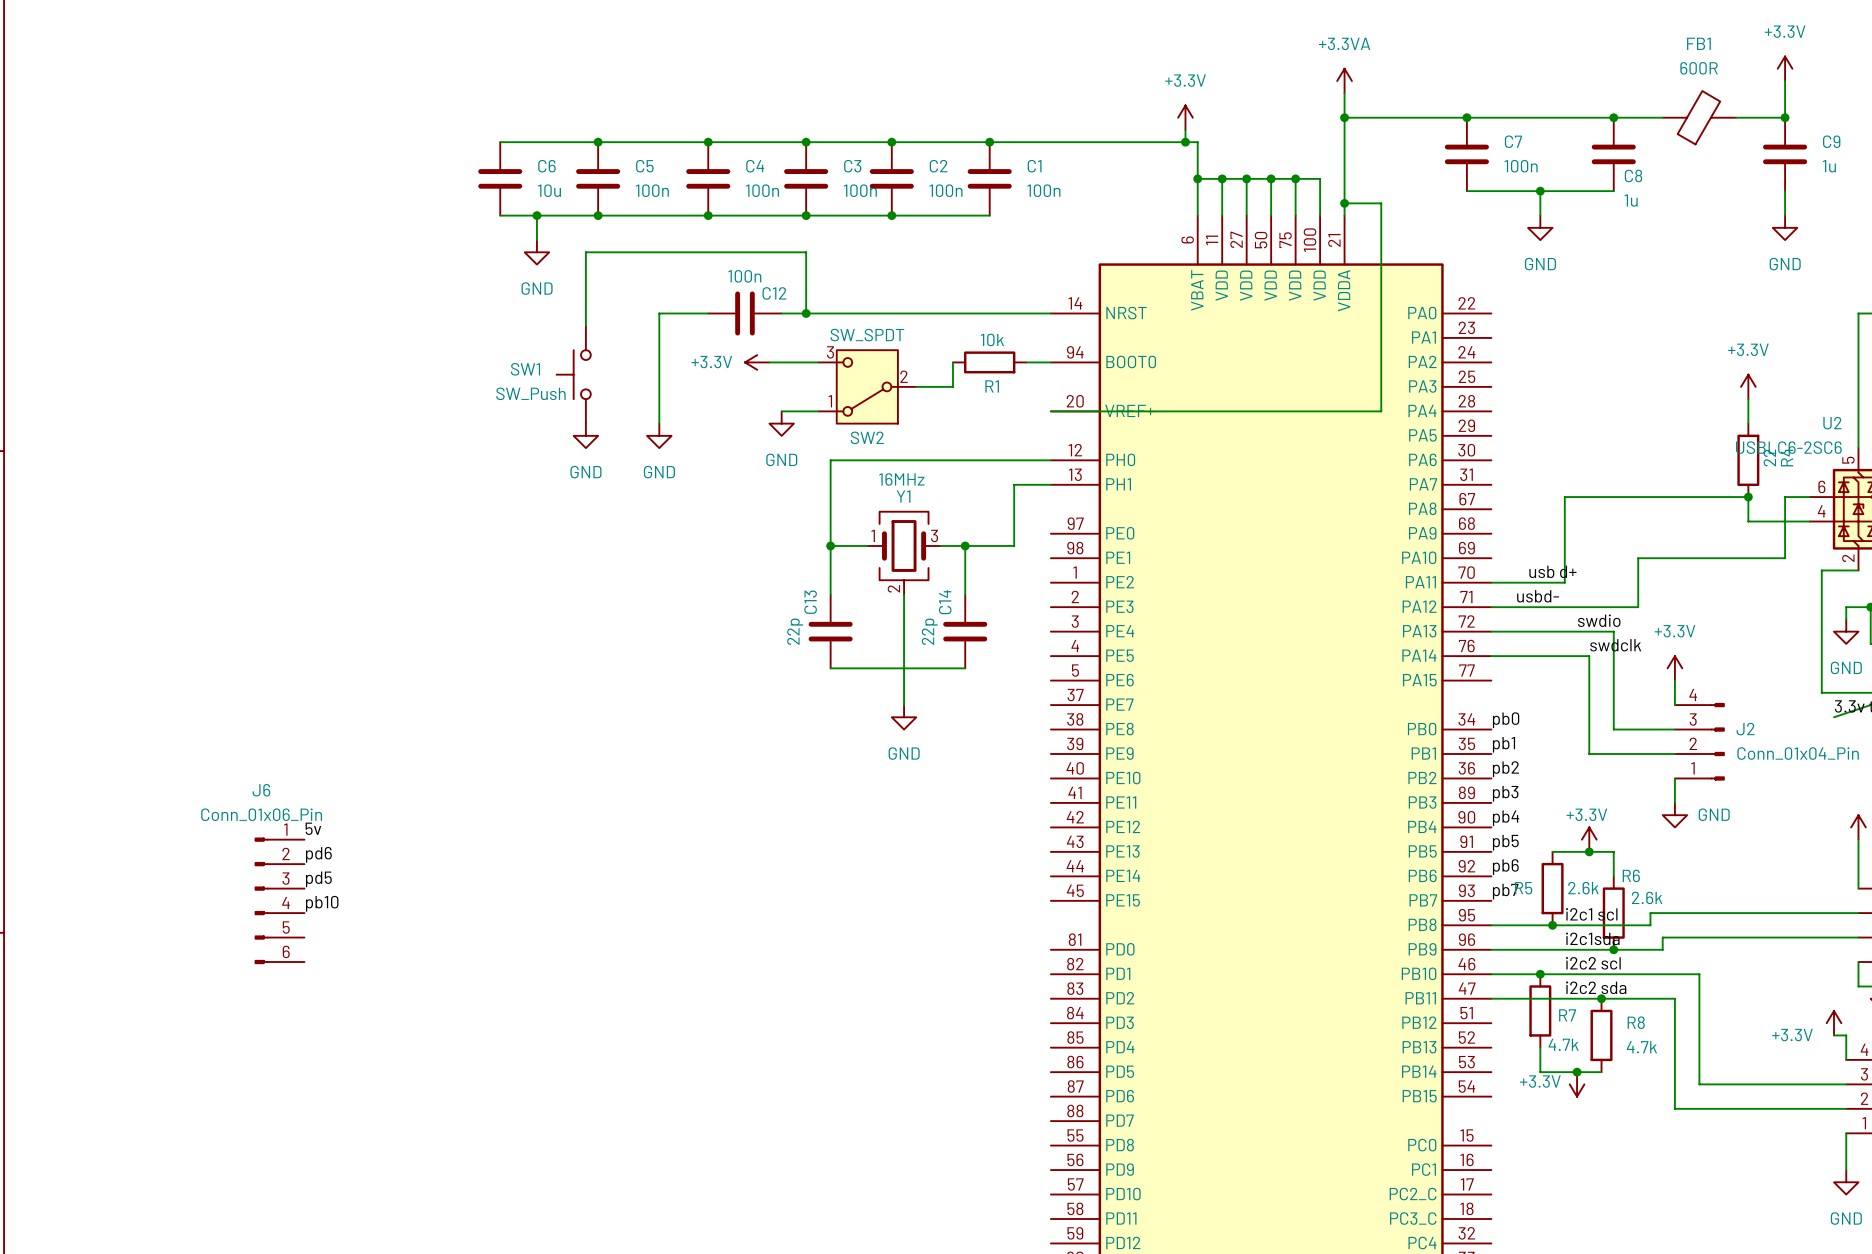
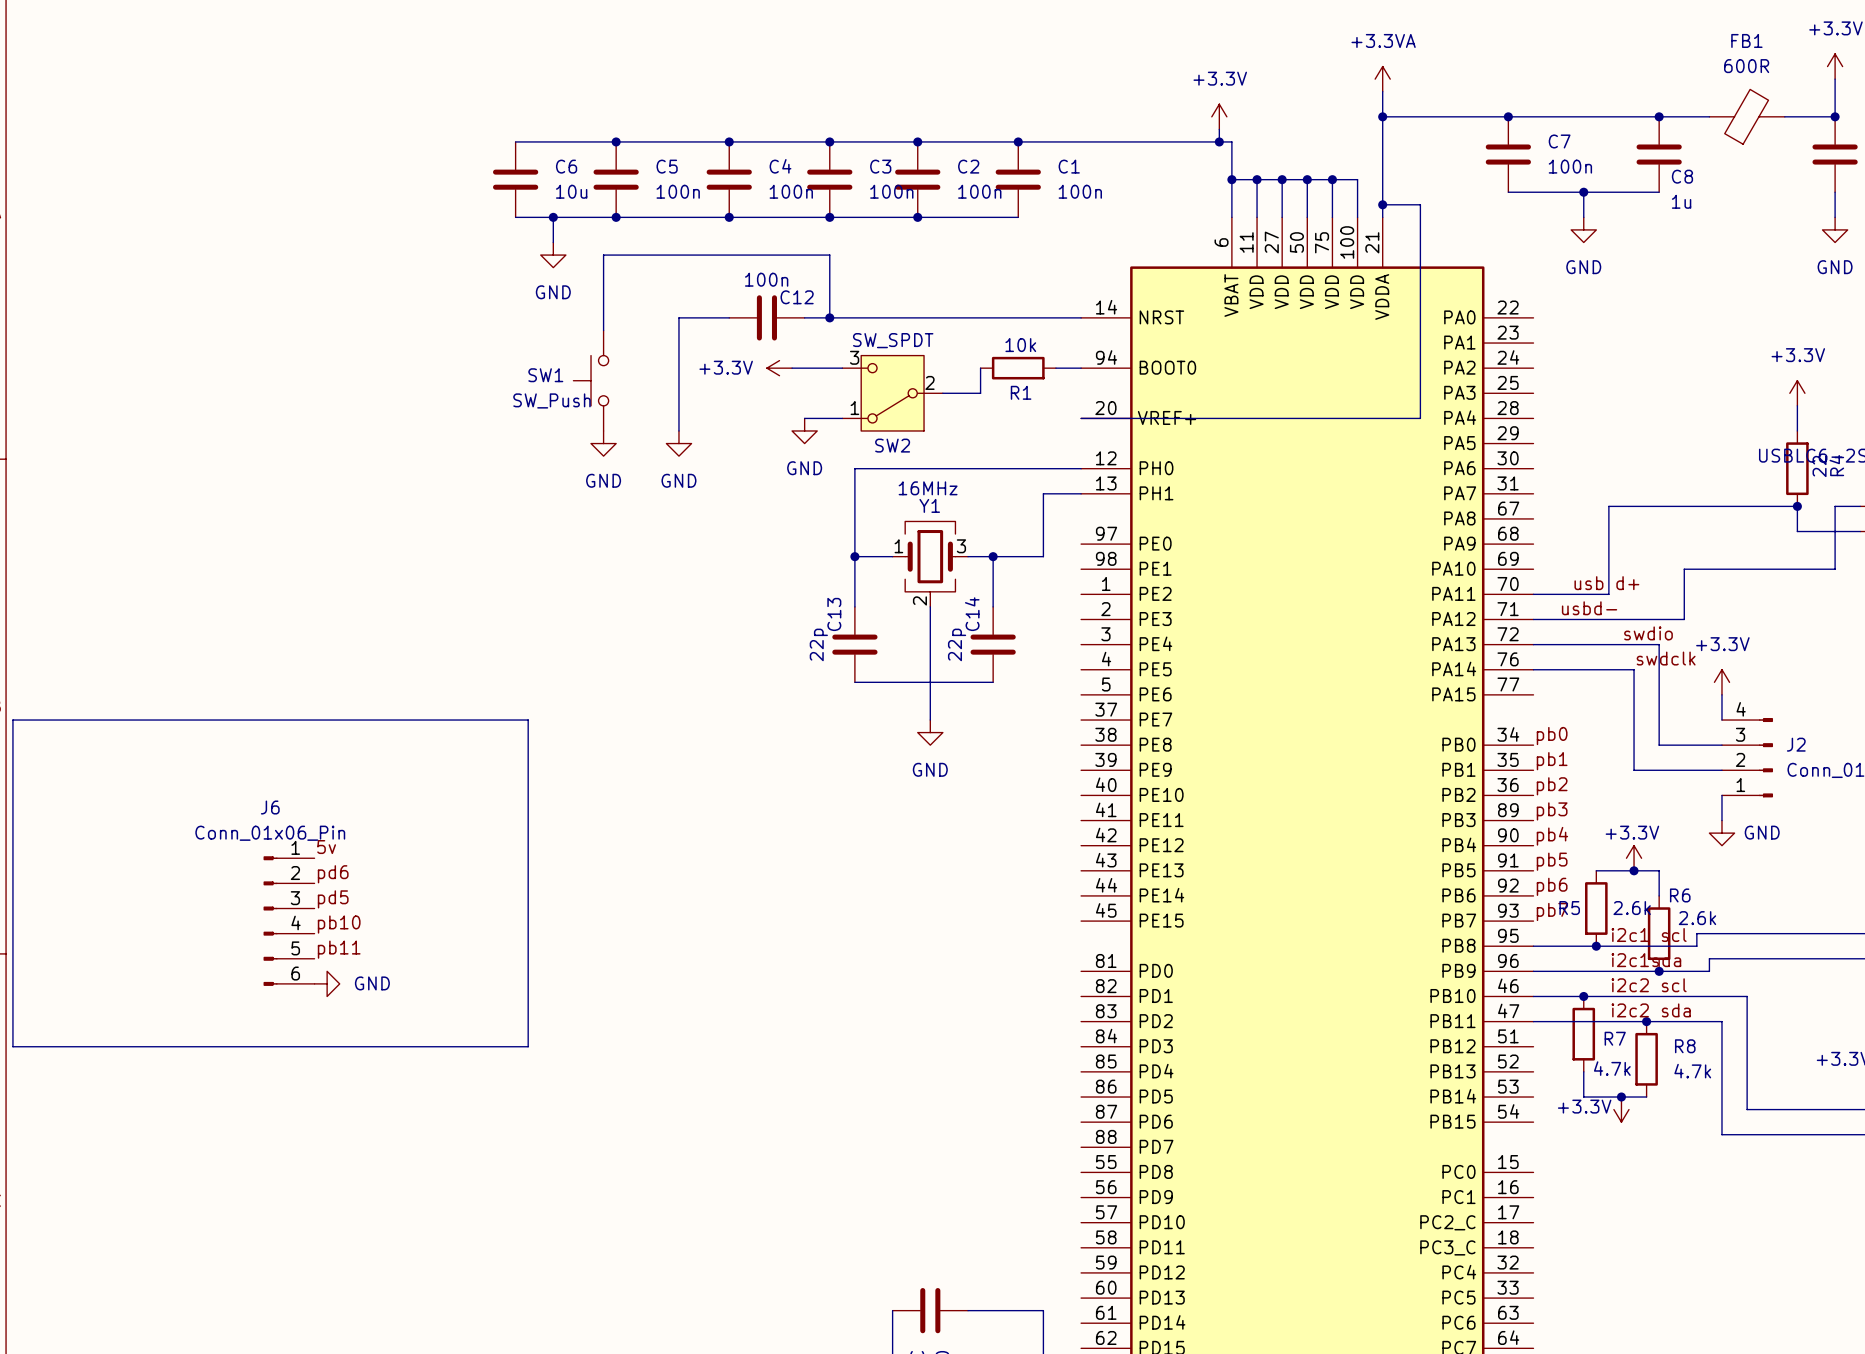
line: none -> (12, 720) (528, 720) (528, 1046) (12, 1046) (12, 720)
label: none -> pb11 (339, 949)
power symbol: none -> GND (327, 983)

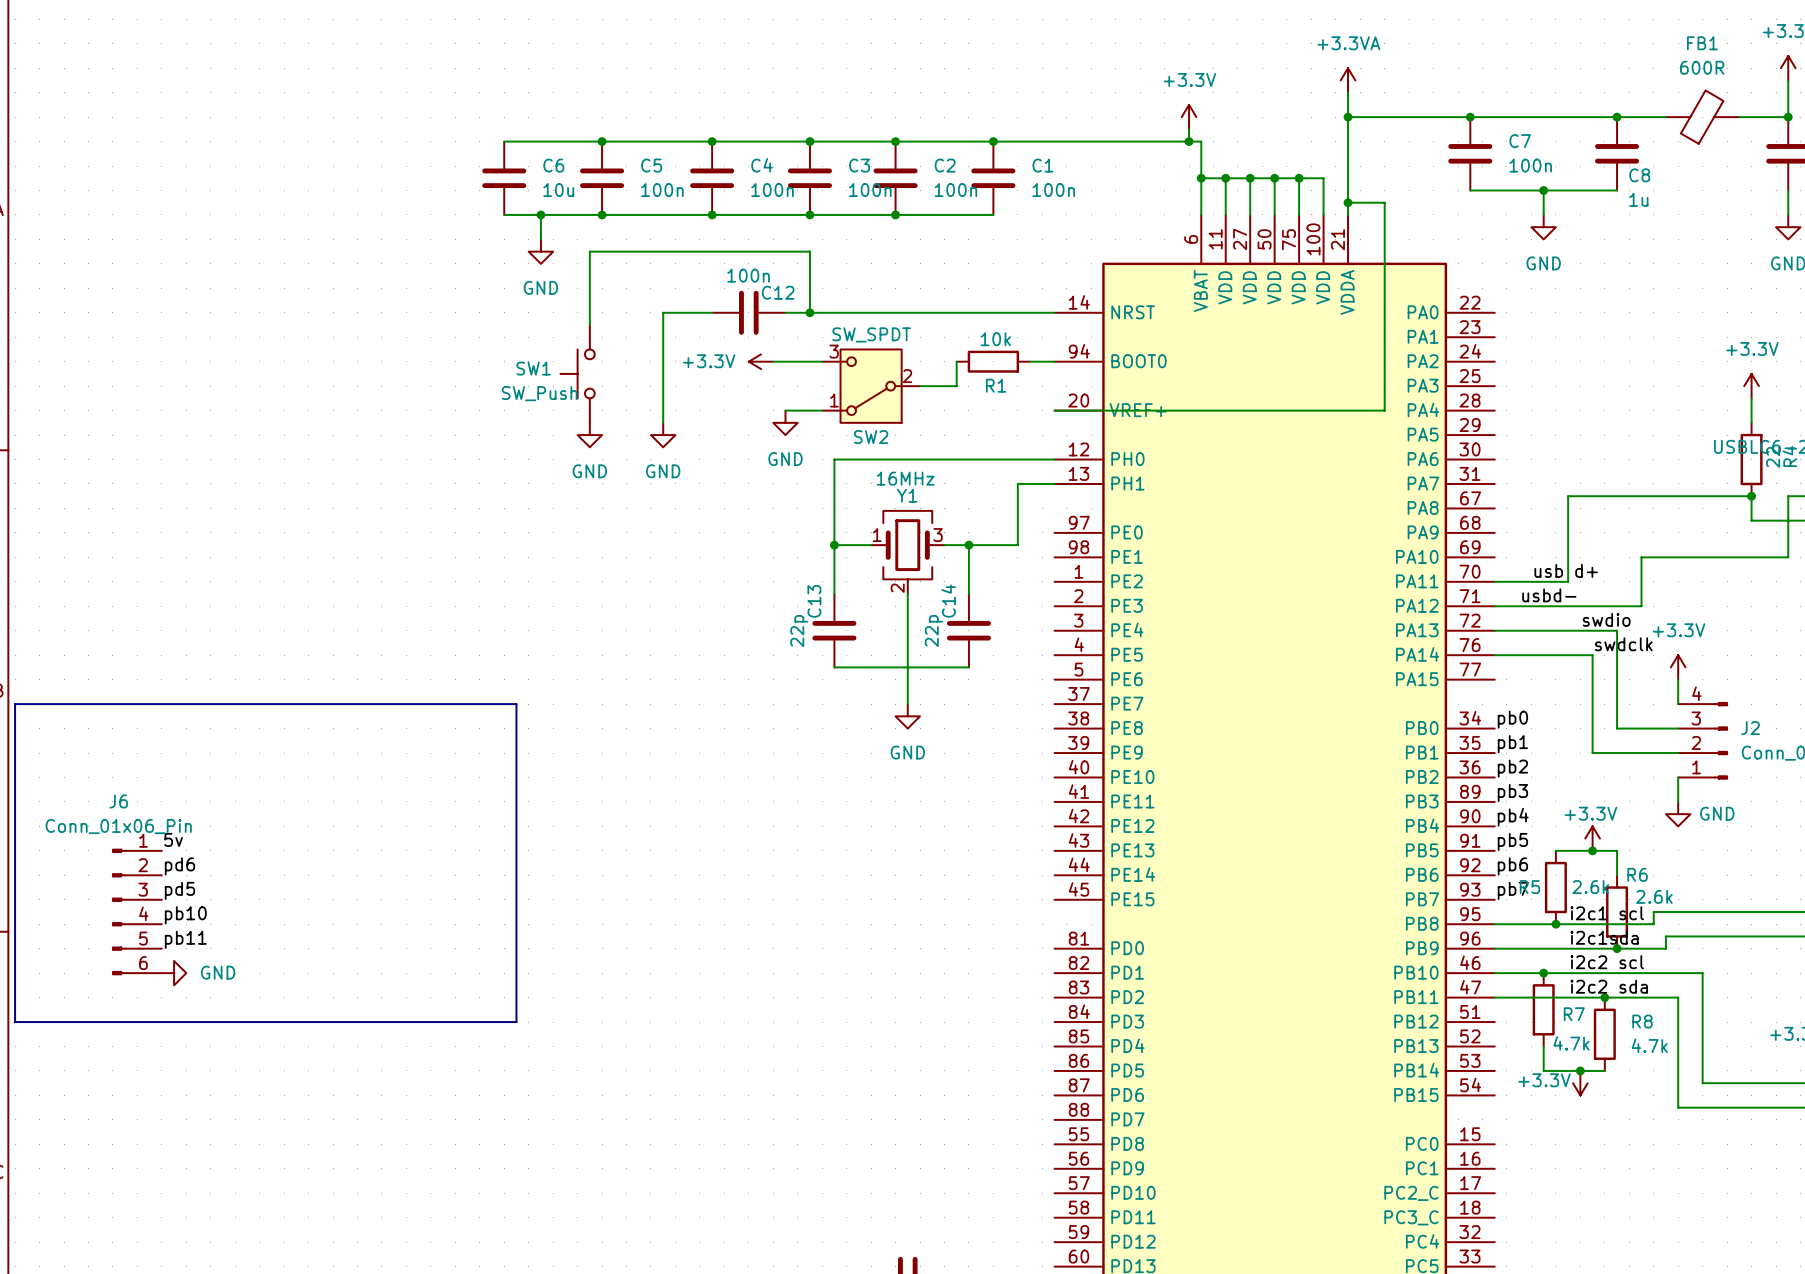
label position: 5v (326, 847) -> 5v (173, 839)
label position: pd6 (333, 874) -> pd6 (179, 866)
label position: pd5 (333, 899) -> pd5 (179, 890)
J6 position: (289, 921) -> (137, 911)
label position: pb10 (339, 924) -> pb10 (185, 915)
label position: pb11 (339, 949) -> pb11 (185, 939)
power symbol position: GND (327, 983) -> GND (174, 973)

